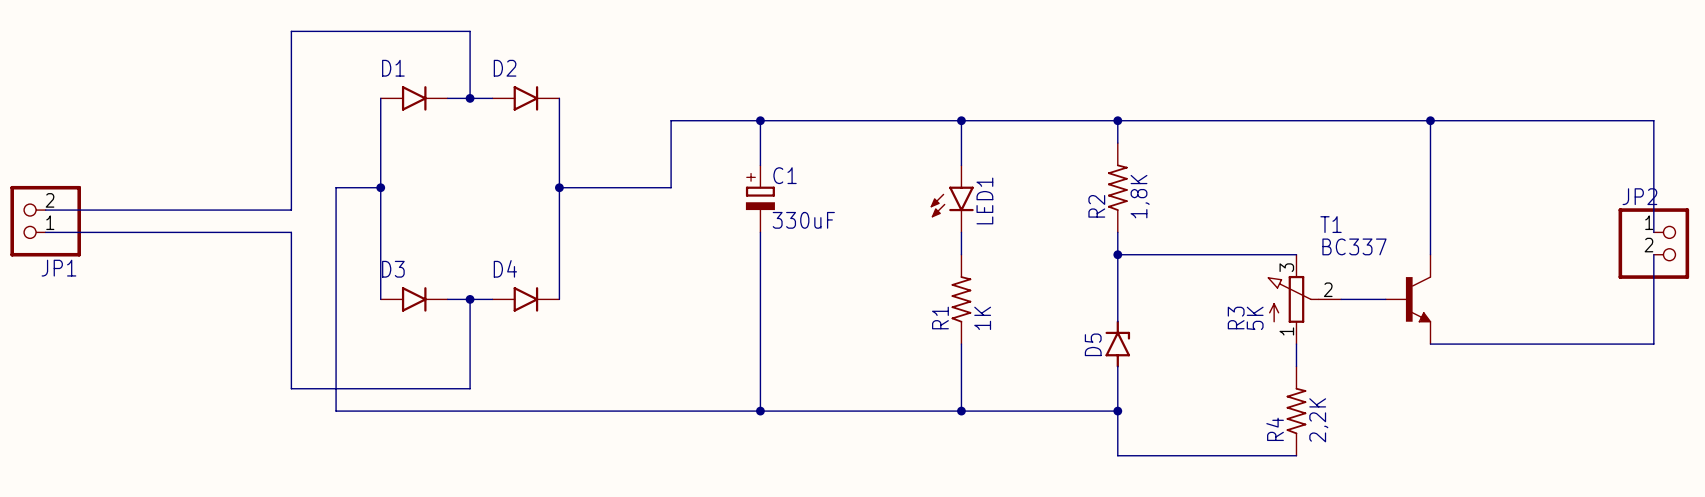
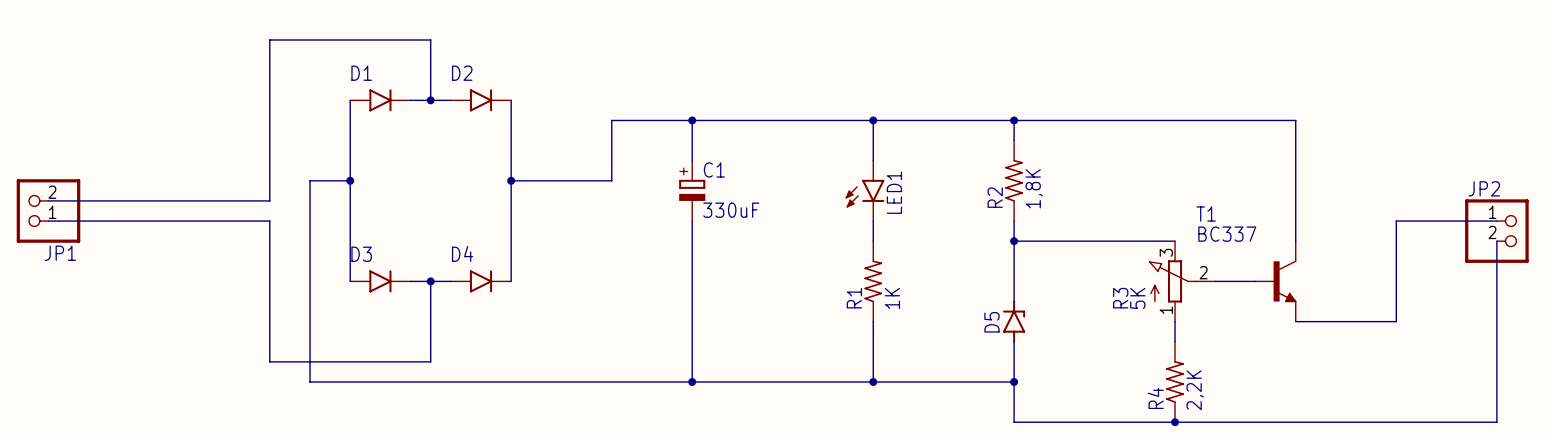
wire: (1430, 120) (1653, 120) (1653, 232) -> none
junction: (1430, 120) -> none
wire: (1542, 344) (1653, 344) -> (1396, 321) (1396, 221) (1496, 221)
wire: none -> (1496, 321) (1496, 422) (1175, 422)
junction: none -> (1175, 422)

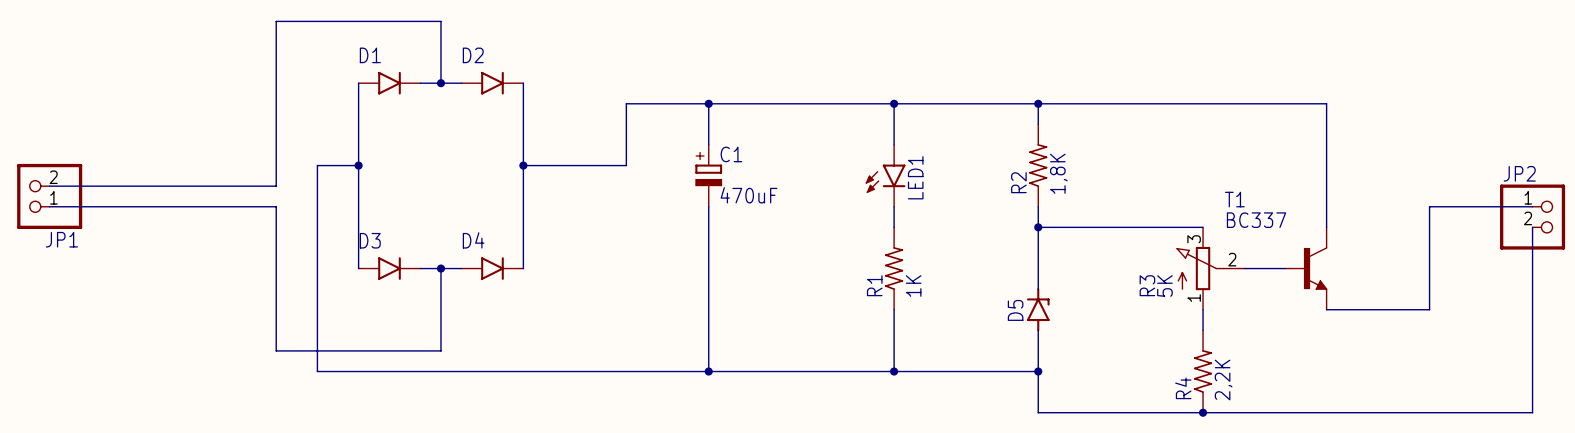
C1 value: 330uF (731, 210) -> 470uF (749, 195)

